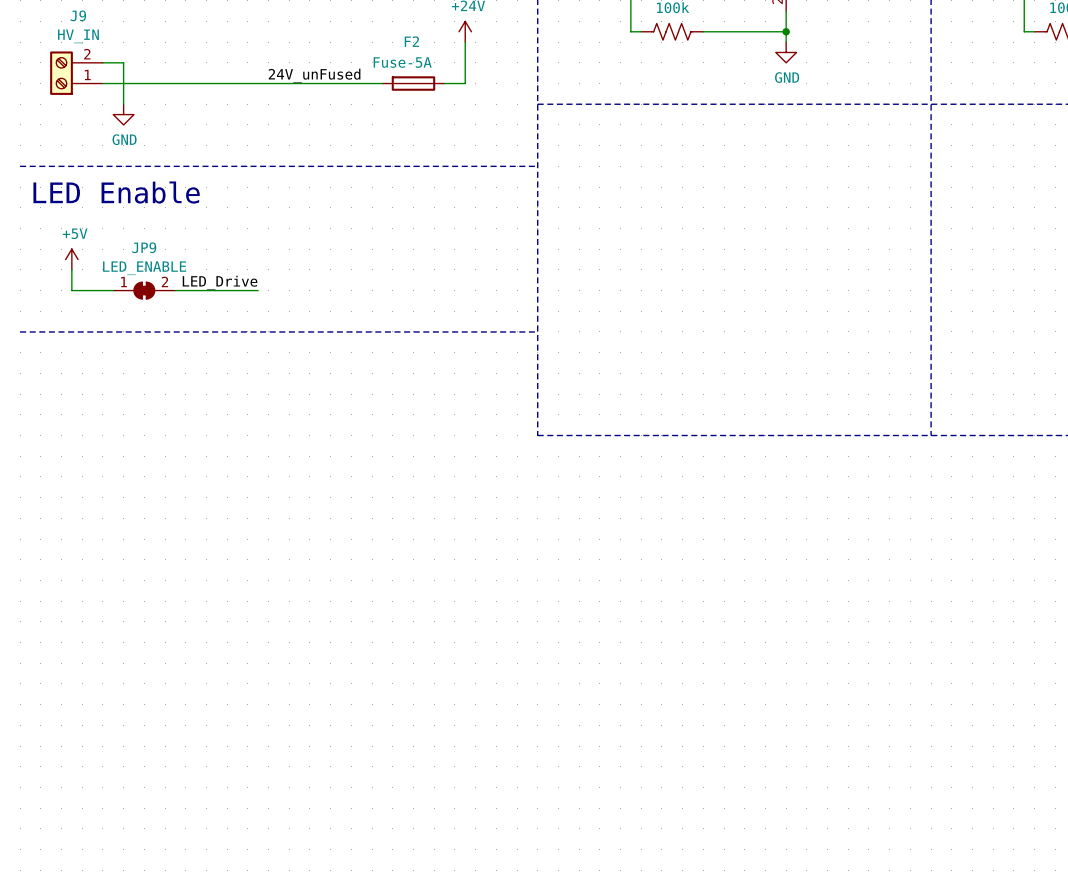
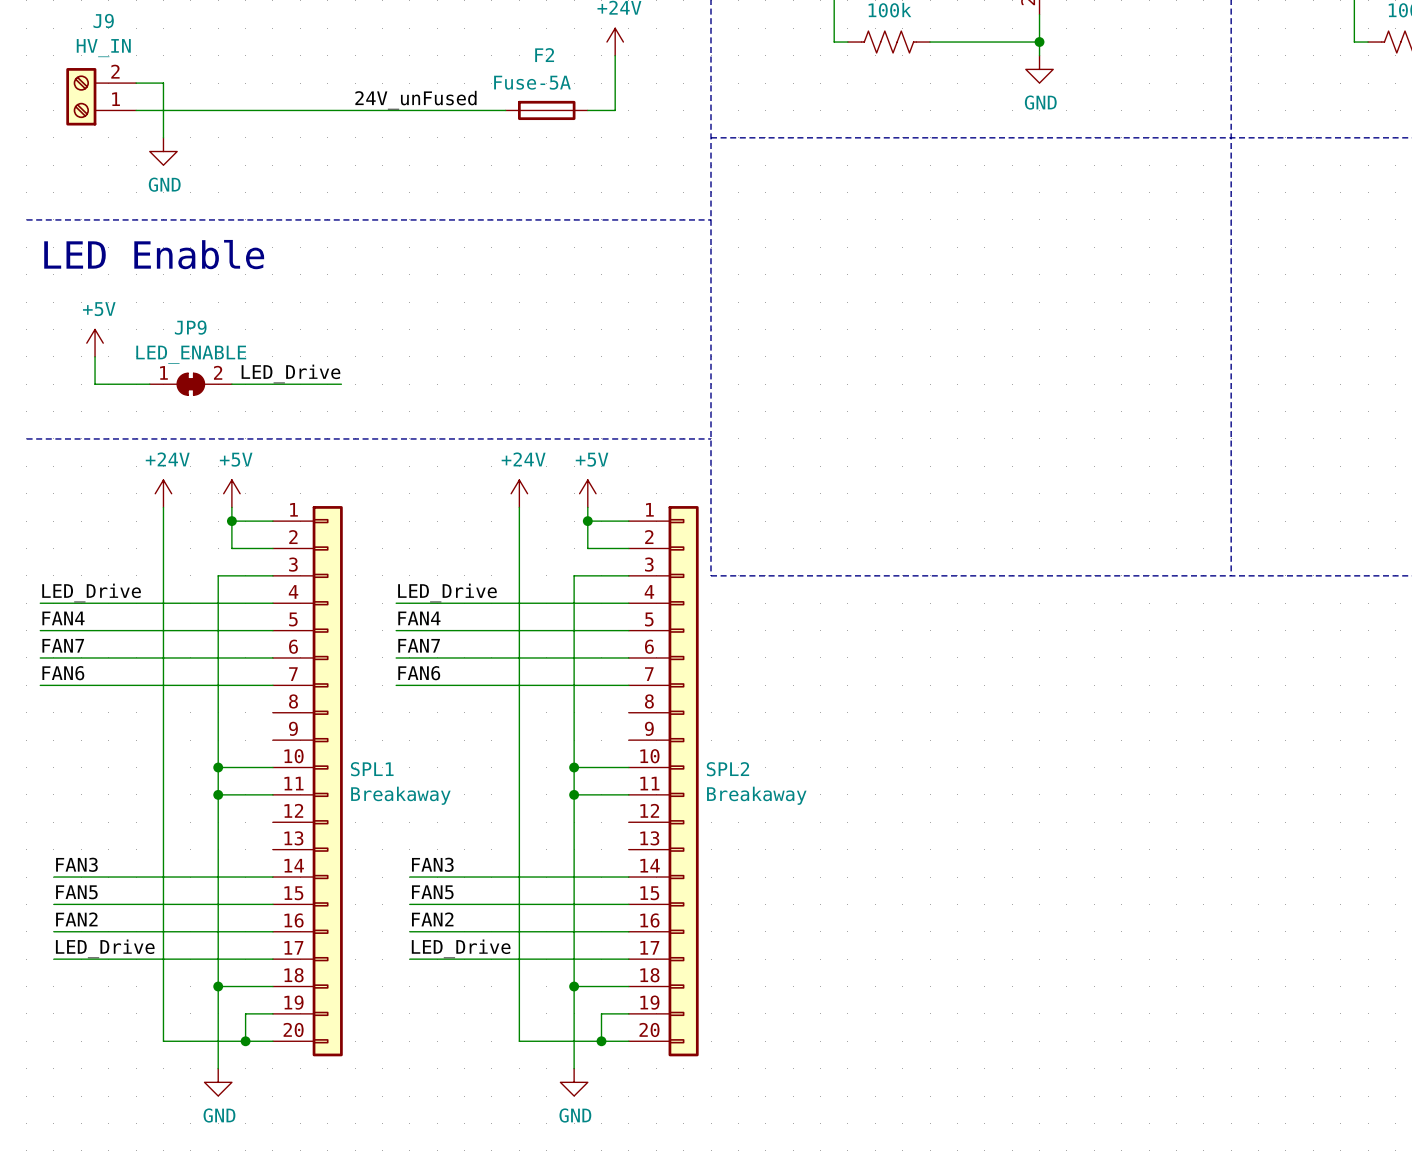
power symbol: none -> +24V (163, 493)
power symbol: none -> +5V (231, 493)
power symbol: none -> +24V (519, 493)
power symbol: none -> +5V (587, 493)
wire: none -> (163, 507) (163, 1041) (272, 1041)
wire: none -> (231, 507) (231, 548) (272, 548)
wire: none -> (519, 507) (519, 1041) (628, 1041)
wire: none -> (587, 507) (587, 548) (628, 548)
wire: none -> (231, 521) (272, 521)
junction: none -> (231, 521)
wire: none -> (587, 521) (628, 521)
junction: none -> (587, 521)
wire: none -> (272, 575) (218, 575) (218, 1068)
wire: none -> (628, 575) (574, 575) (574, 1068)
label: none -> LED_Drive (91, 592)
label: none -> LED_Drive (447, 592)
wire: none -> (40, 603) (272, 603)
wire: none -> (396, 603) (628, 603)
label: none -> FAN4 (63, 618)
label: none -> FAN4 (419, 618)
wire: none -> (40, 630) (272, 630)
wire: none -> (396, 630) (628, 630)
label: none -> FAN7 (63, 645)
label: none -> FAN7 (419, 645)
wire: none -> (40, 657) (272, 657)
wire: none -> (396, 657) (628, 657)
label: none -> FAN6 (63, 673)
label: none -> FAN6 (419, 673)
wire: none -> (40, 685) (272, 685)
wire: none -> (396, 685) (628, 685)
wire: none -> (218, 767) (272, 767)
junction: none -> (218, 767)
wire: none -> (574, 767) (628, 767)
junction: none -> (574, 767)
SPL1: none -> Breakaway (307, 781)
SPL2: none -> Breakaway (663, 781)
wire: none -> (218, 794) (272, 794)
junction: none -> (218, 794)
wire: none -> (574, 794) (628, 794)
junction: none -> (574, 794)
label: none -> FAN3 (76, 864)
label: none -> FAN3 (432, 864)
wire: none -> (53, 877) (272, 877)
wire: none -> (409, 877) (628, 877)
label: none -> FAN5 (76, 892)
label: none -> FAN5 (432, 892)
wire: none -> (53, 904) (272, 904)
wire: none -> (409, 904) (628, 904)
label: none -> FAN2 (76, 919)
label: none -> FAN2 (432, 919)
wire: none -> (53, 931) (272, 931)
wire: none -> (409, 931) (628, 931)
label: none -> LED_Drive (105, 948)
label: none -> LED_Drive (461, 948)
wire: none -> (53, 959) (272, 959)
wire: none -> (409, 959) (628, 959)
wire: none -> (218, 986) (272, 986)
junction: none -> (218, 986)
wire: none -> (574, 986) (628, 986)
junction: none -> (574, 986)
wire: none -> (272, 1013) (245, 1013) (245, 1041)
wire: none -> (628, 1013) (601, 1013) (601, 1041)
junction: none -> (245, 1041)
junction: none -> (601, 1041)
power symbol: none -> GND (218, 1082)
power symbol: none -> GND (574, 1082)

